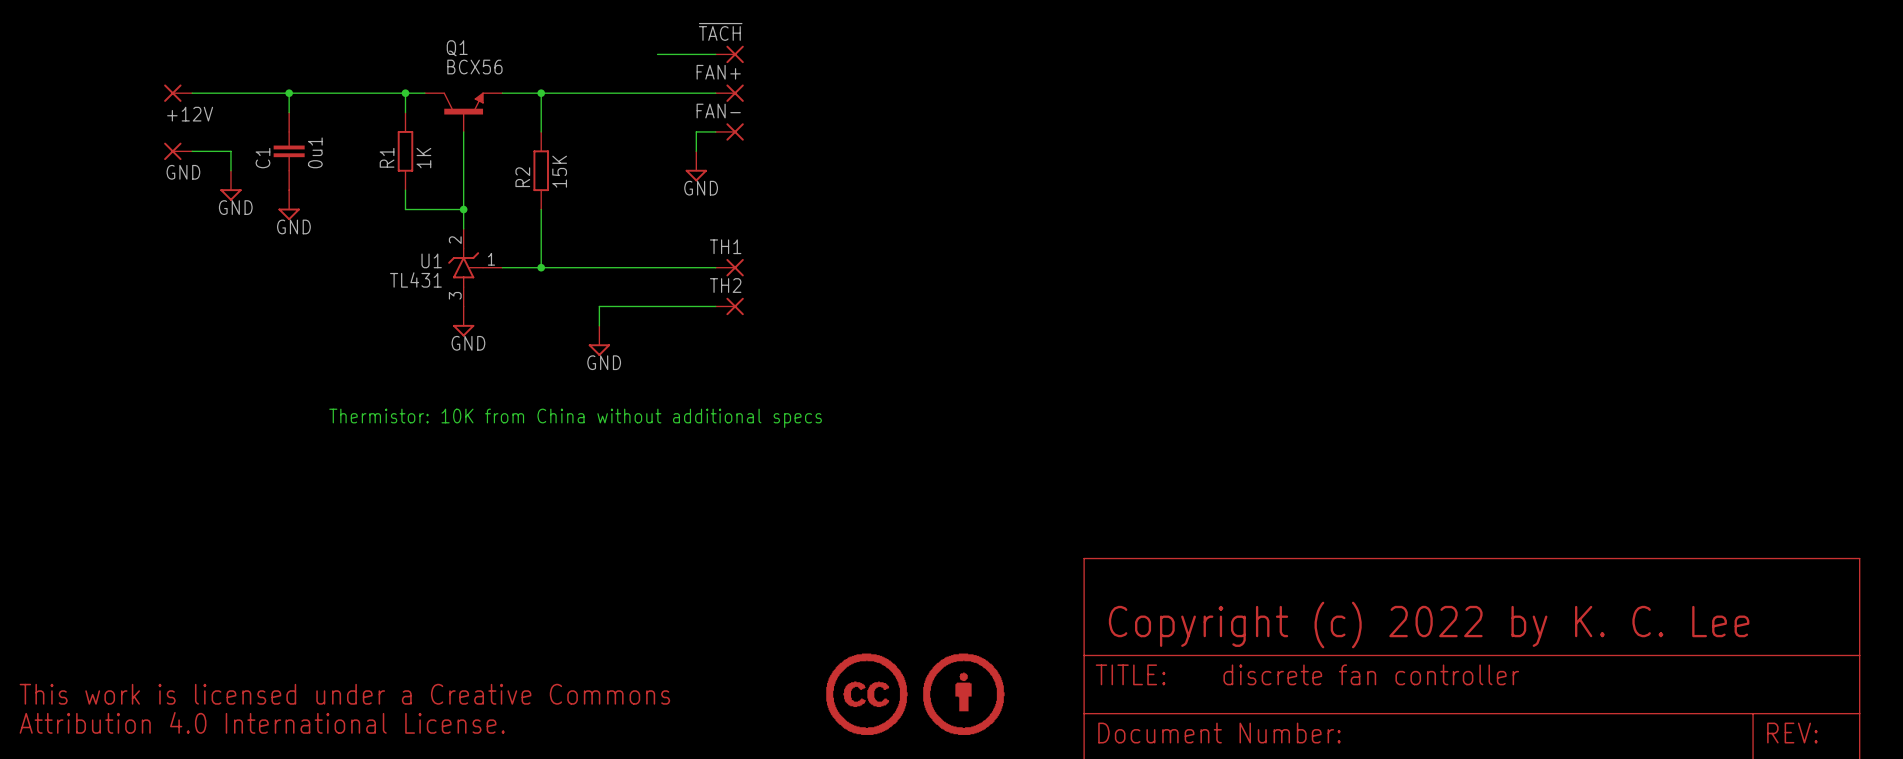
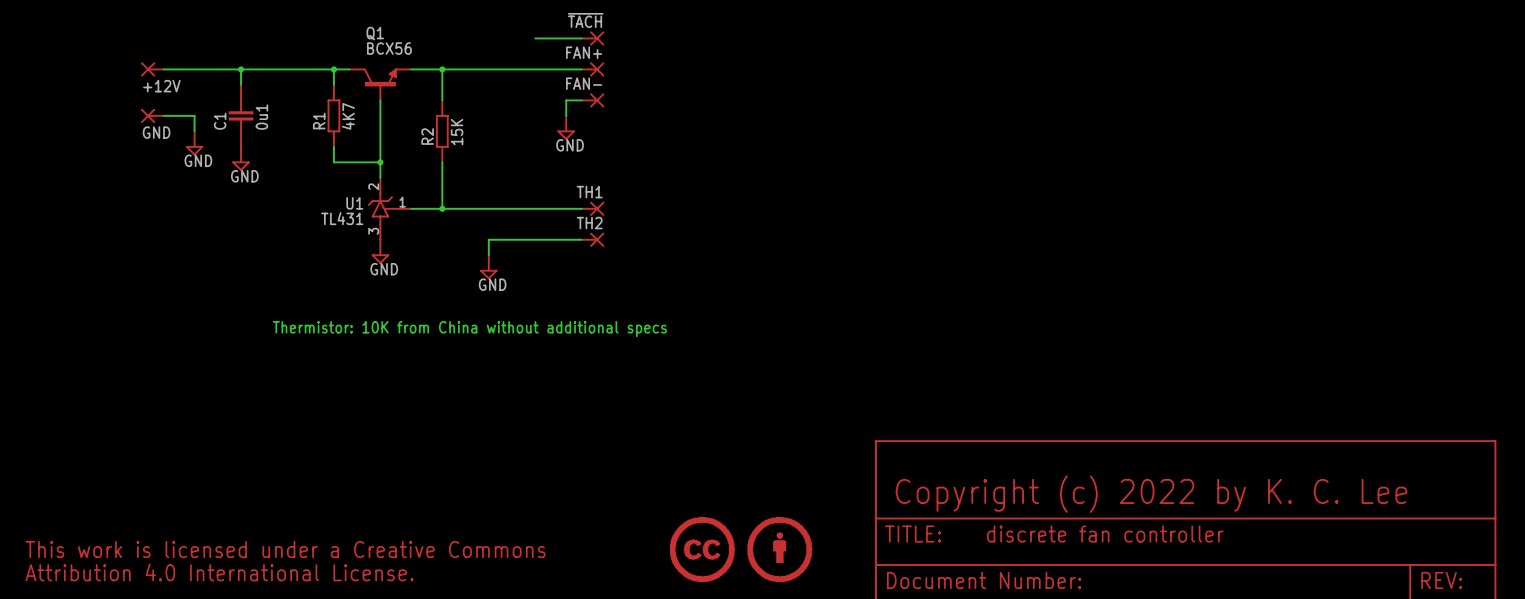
R1 value: 1K (423, 158) -> 4K7 (348, 116)

